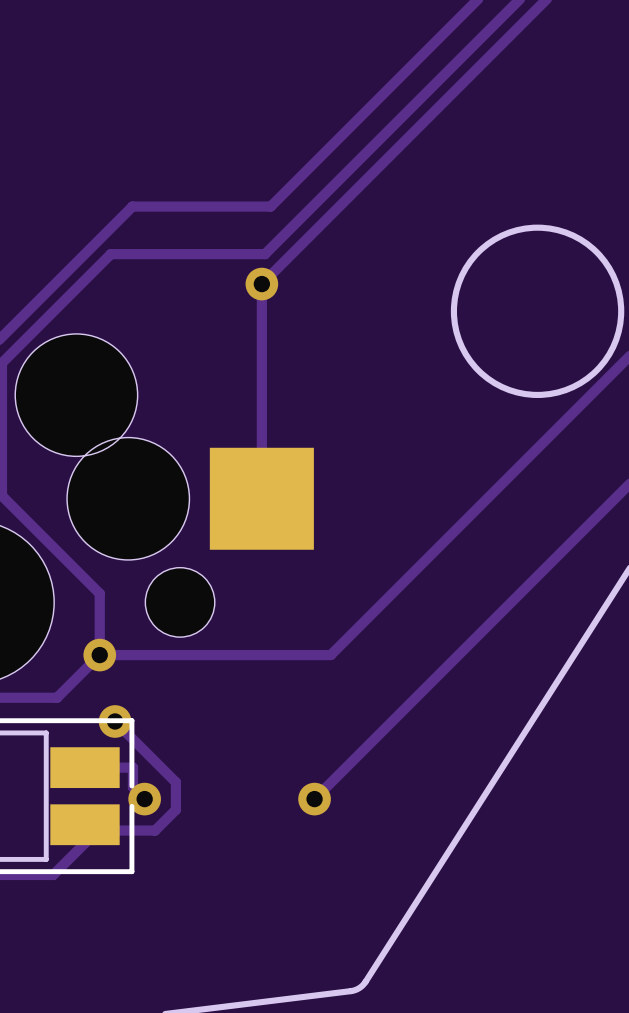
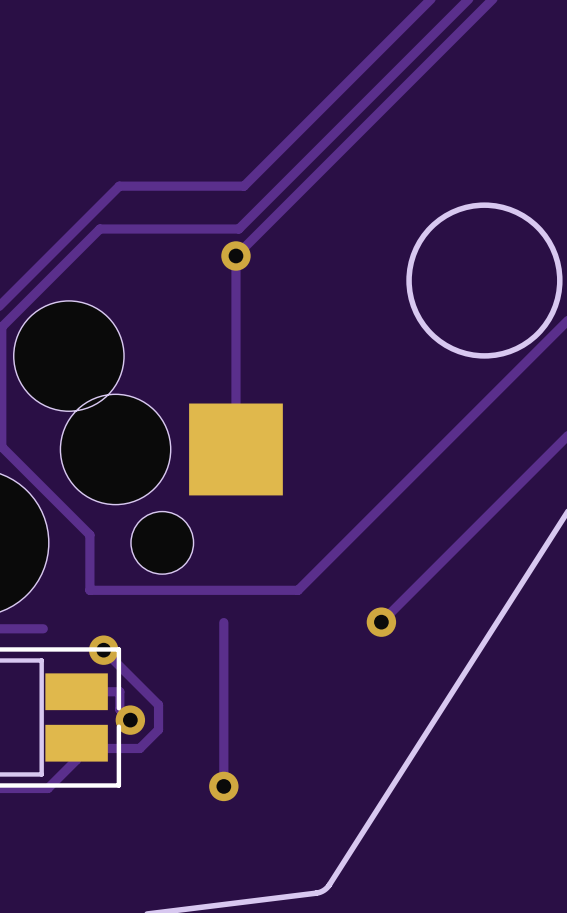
track: (99, 655) (57, 697) (48, 697) -> none
via: (99, 655) -> none
track: none -> (223, 622) (223, 786)
track: (423, 690) (314, 799) -> none
via: none -> (381, 622)
via: (314, 799) -> none
via: none -> (223, 786)

